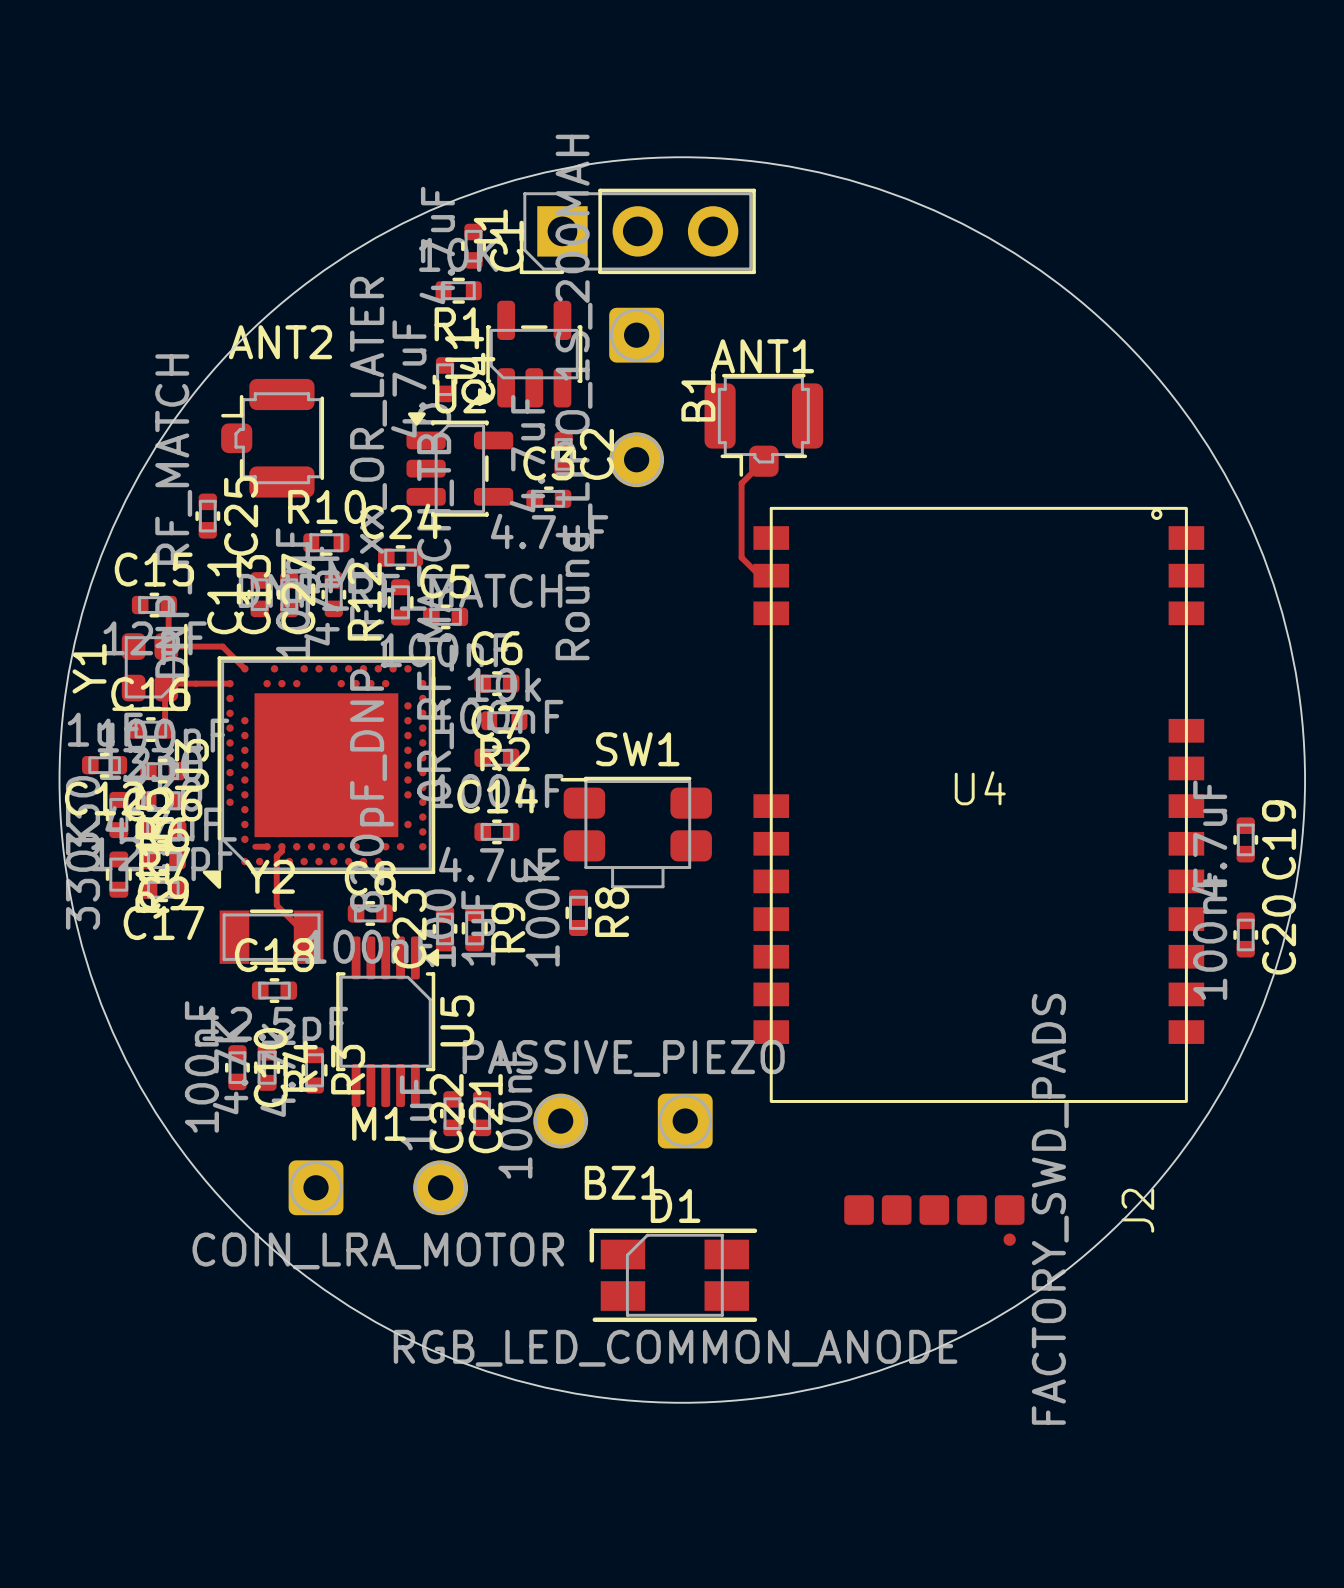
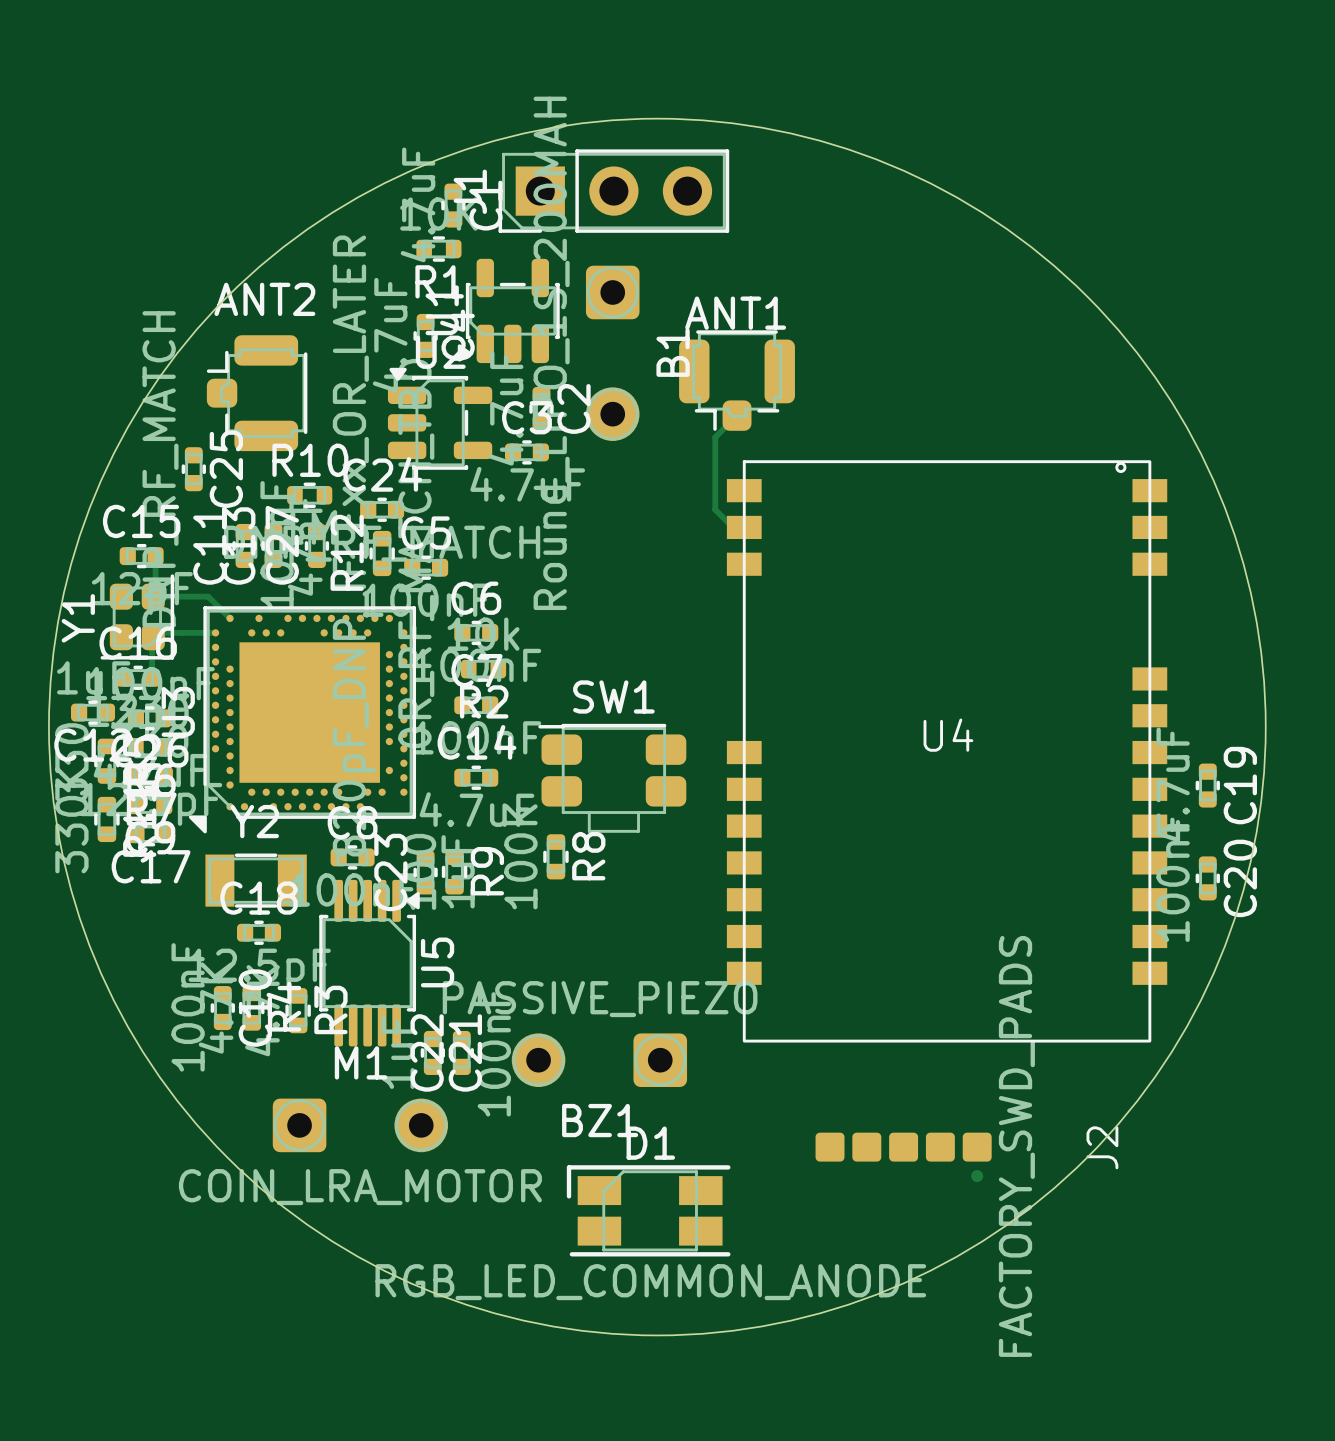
track: (255, 846) (267, 846) -> none
track: (281, 846) (281, 851) (276, 856) (276, 905) (308, 937) -> none

